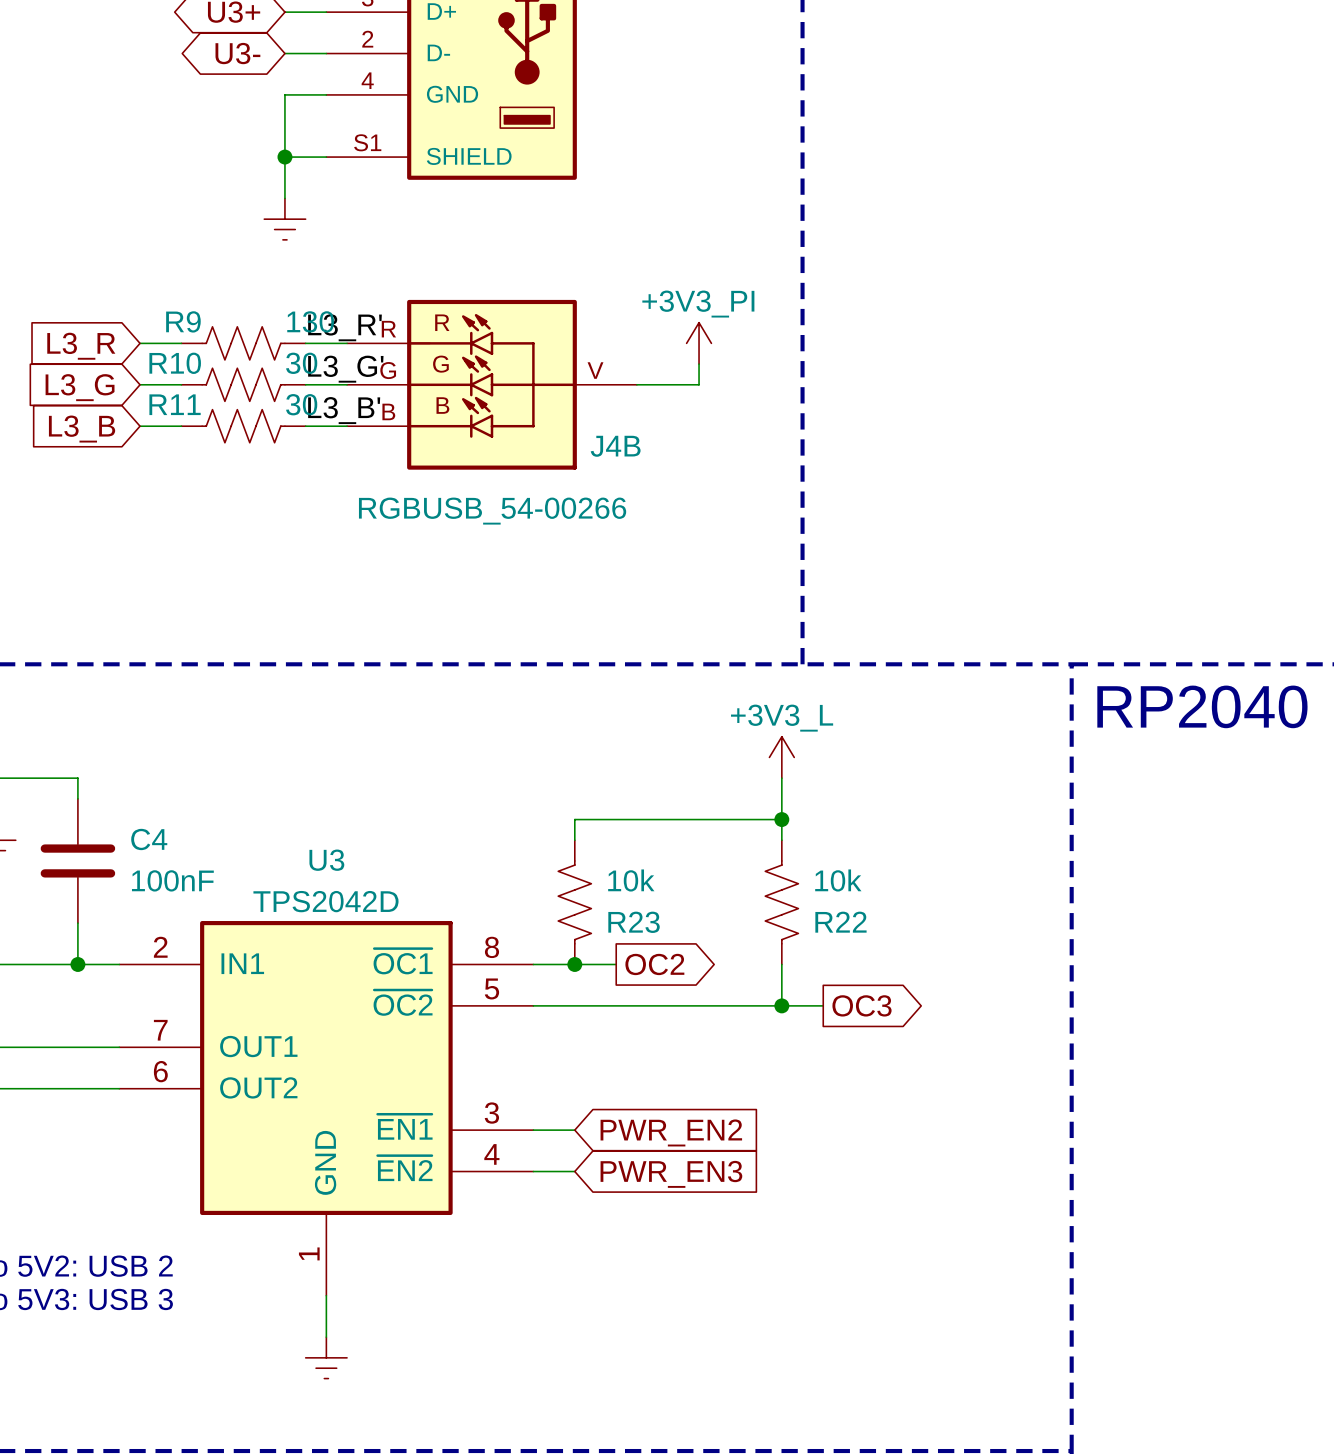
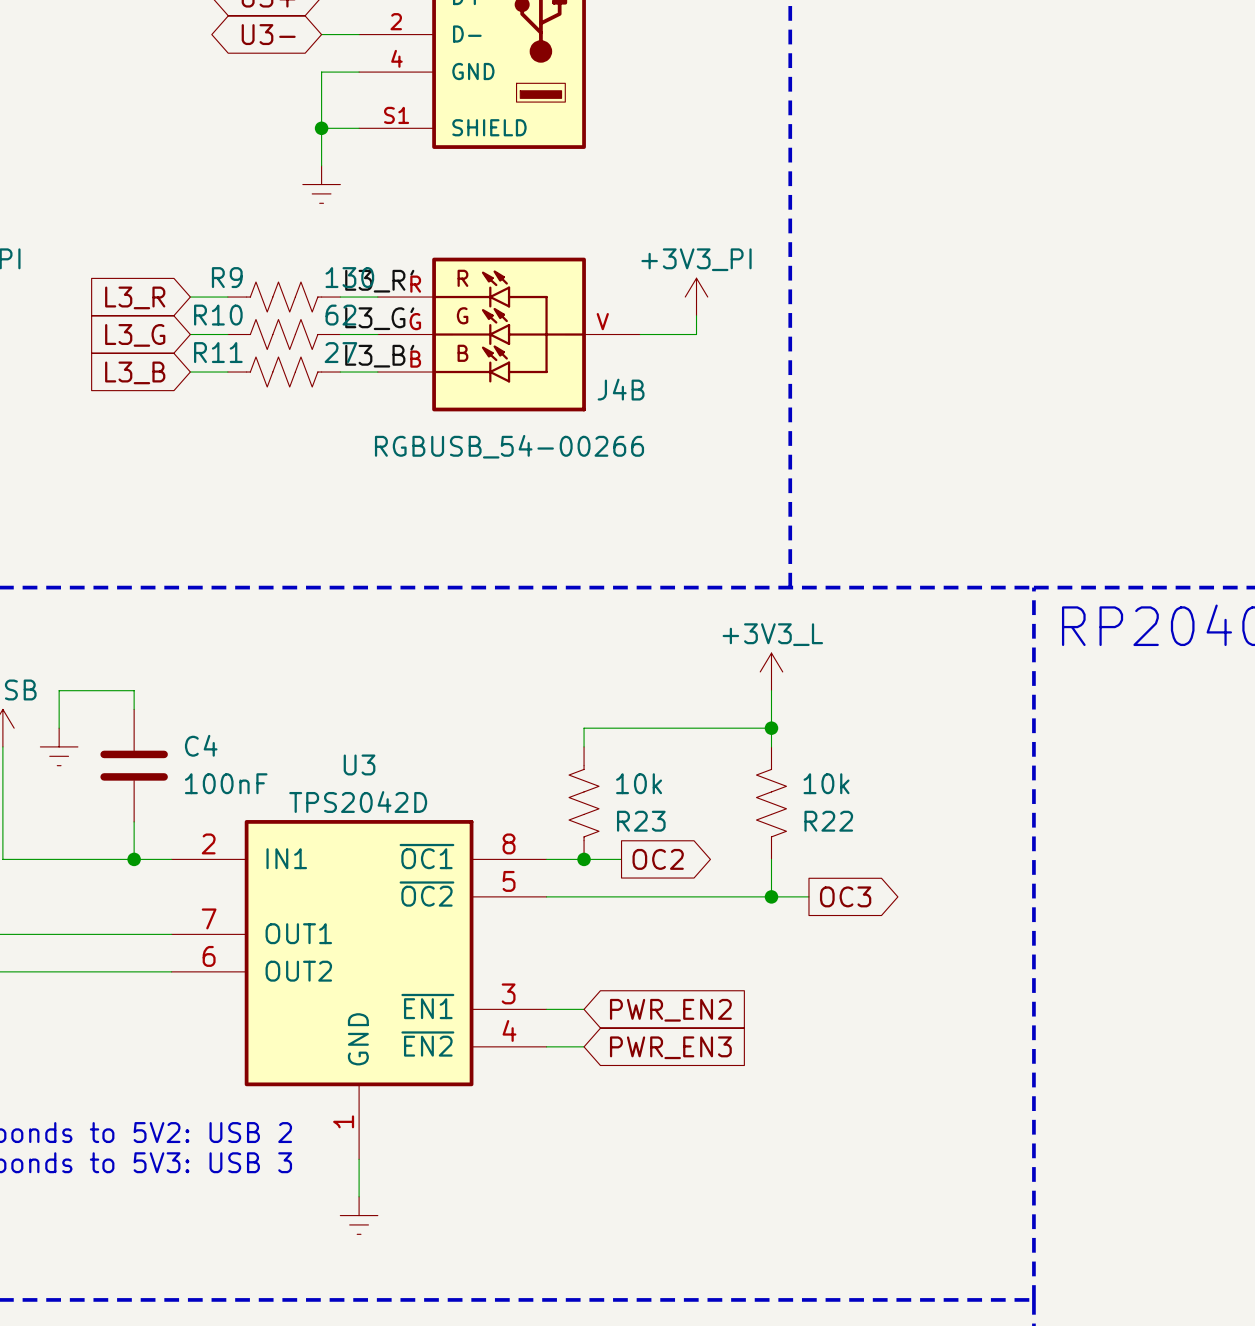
R10 value: 30 (301, 363) -> 62 (340, 315)
R11 value: 30 (301, 404) -> 27 (340, 352)

